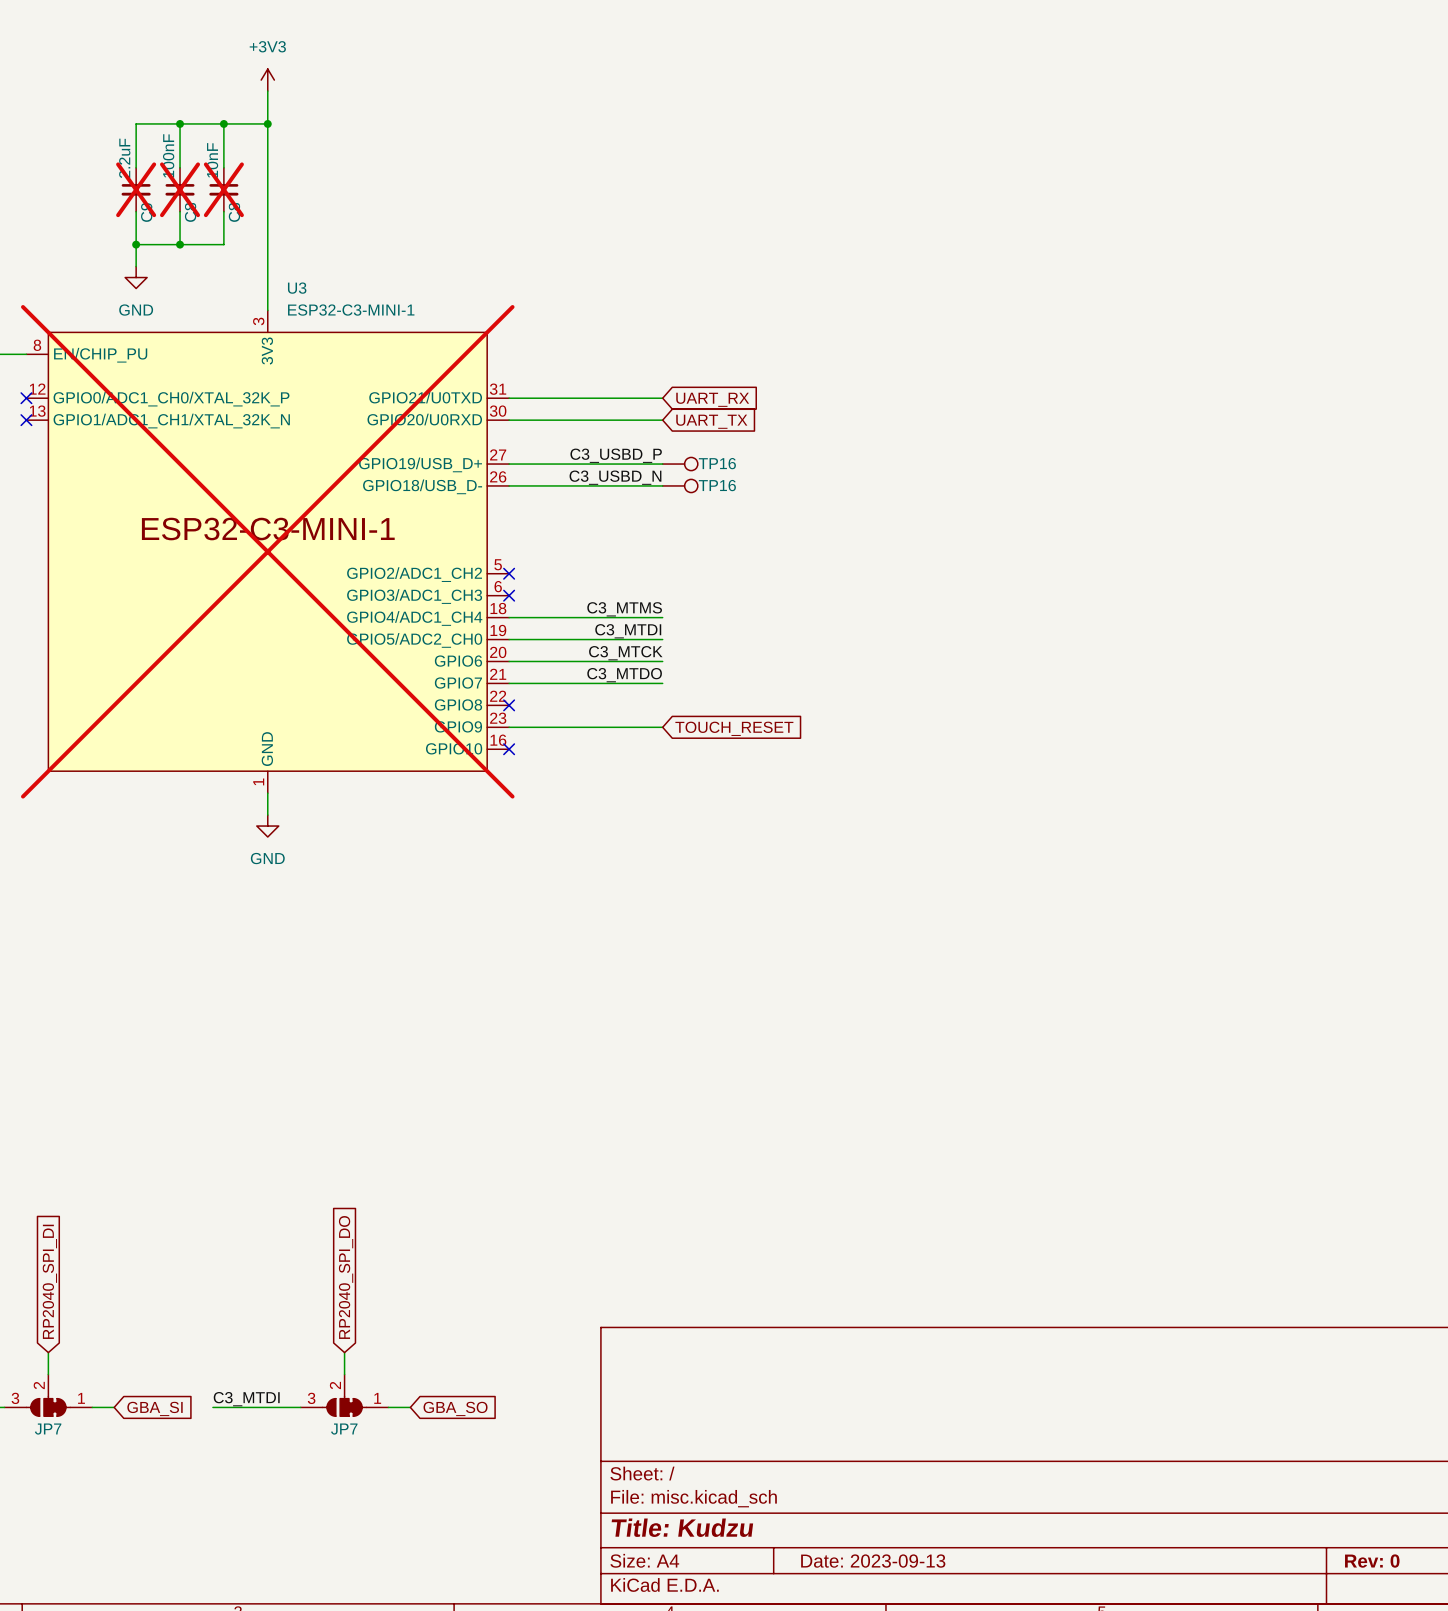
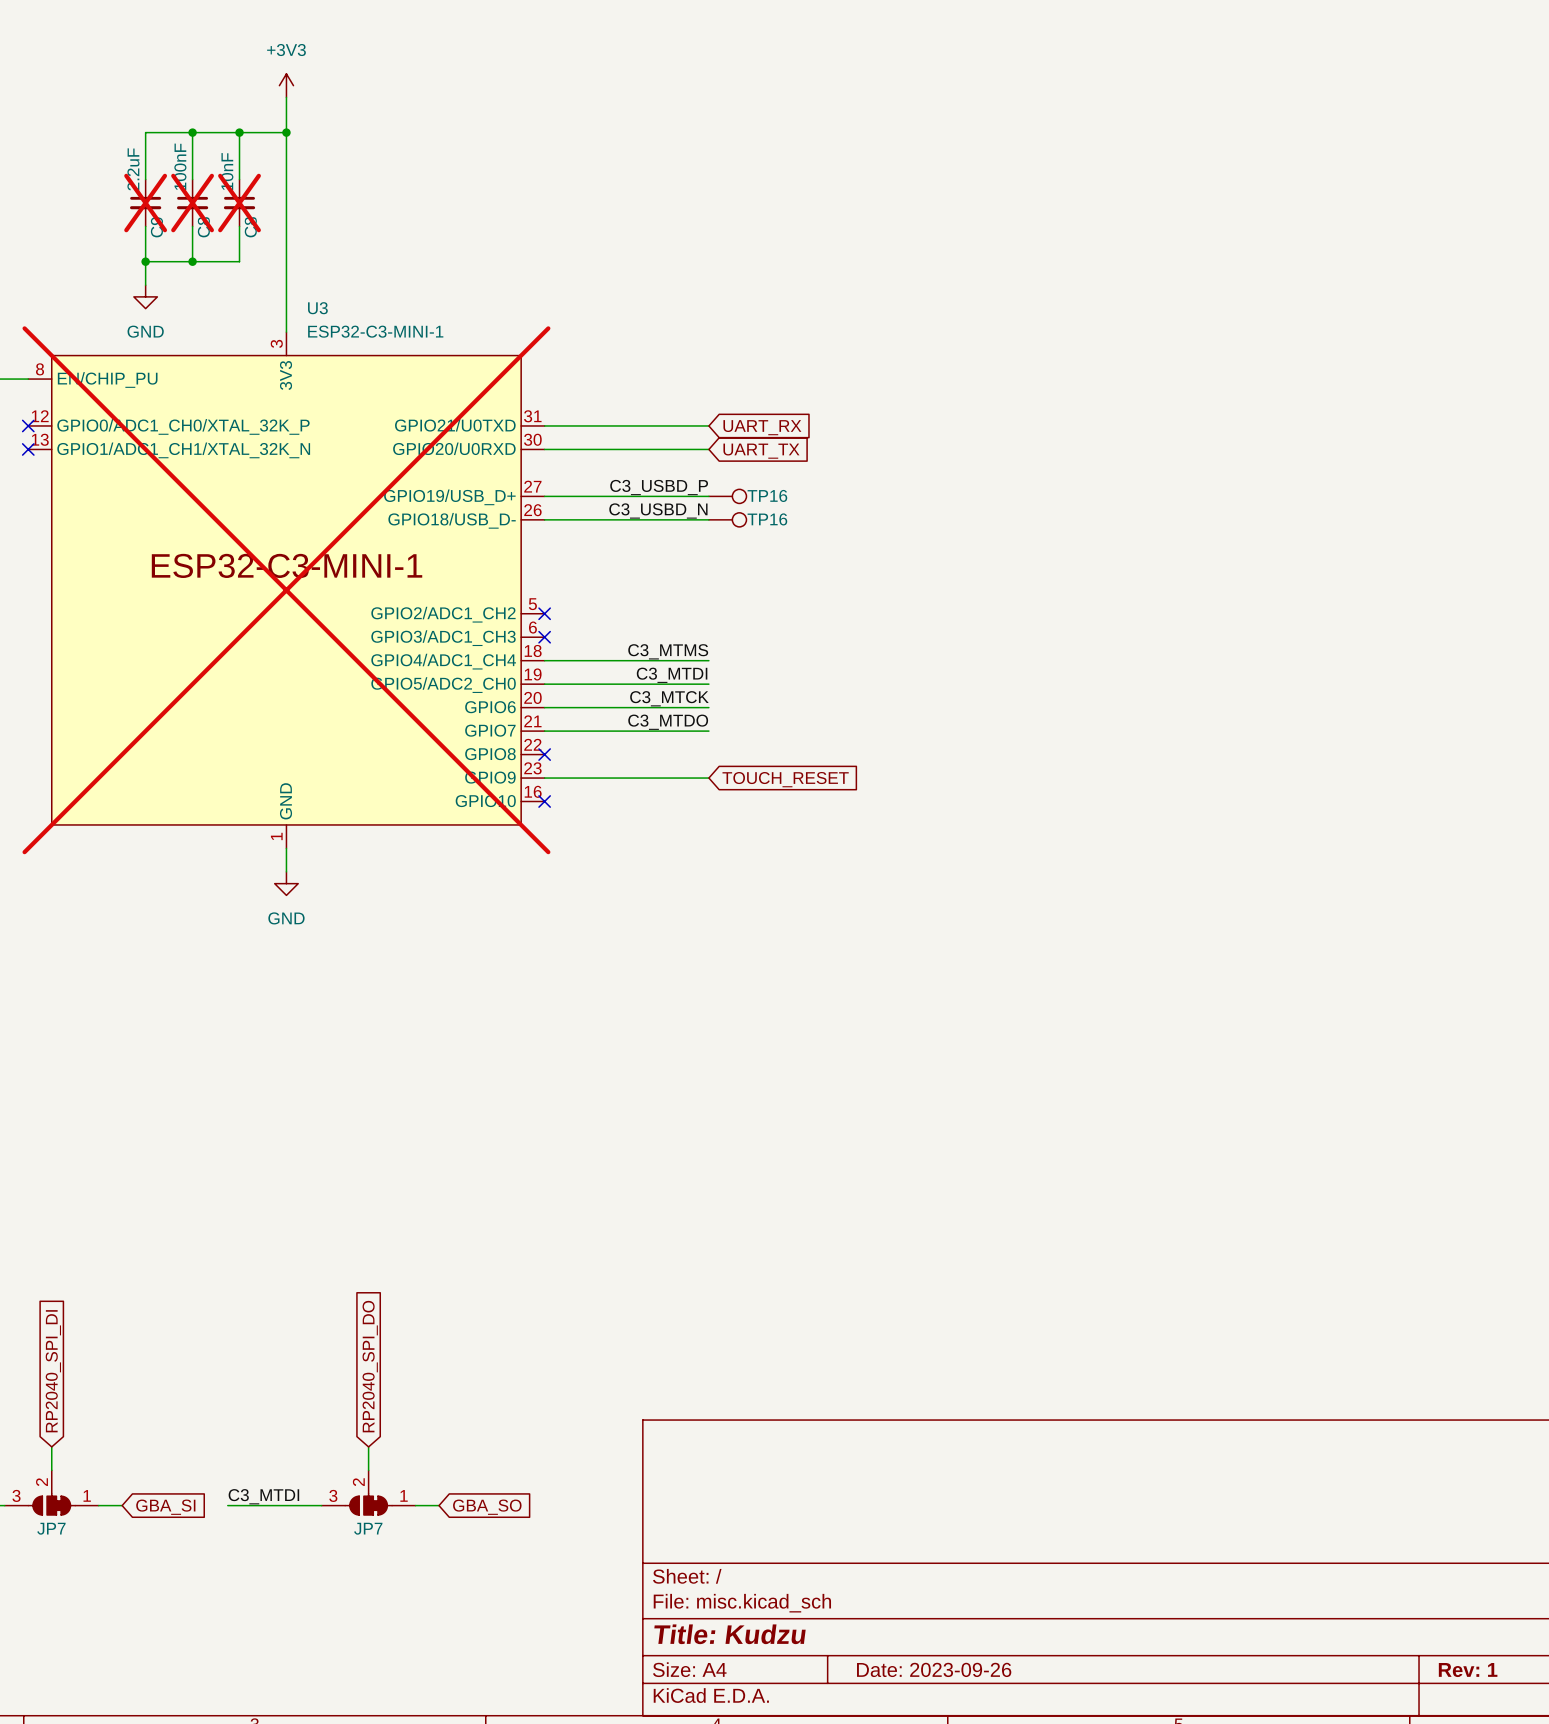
title block: Date: 2023-09-13 (873, 1561) -> Date: 2023-09-26 (934, 1669)
title block: Rev: 0 (1372, 1561) -> Rev: 1 (1468, 1670)

